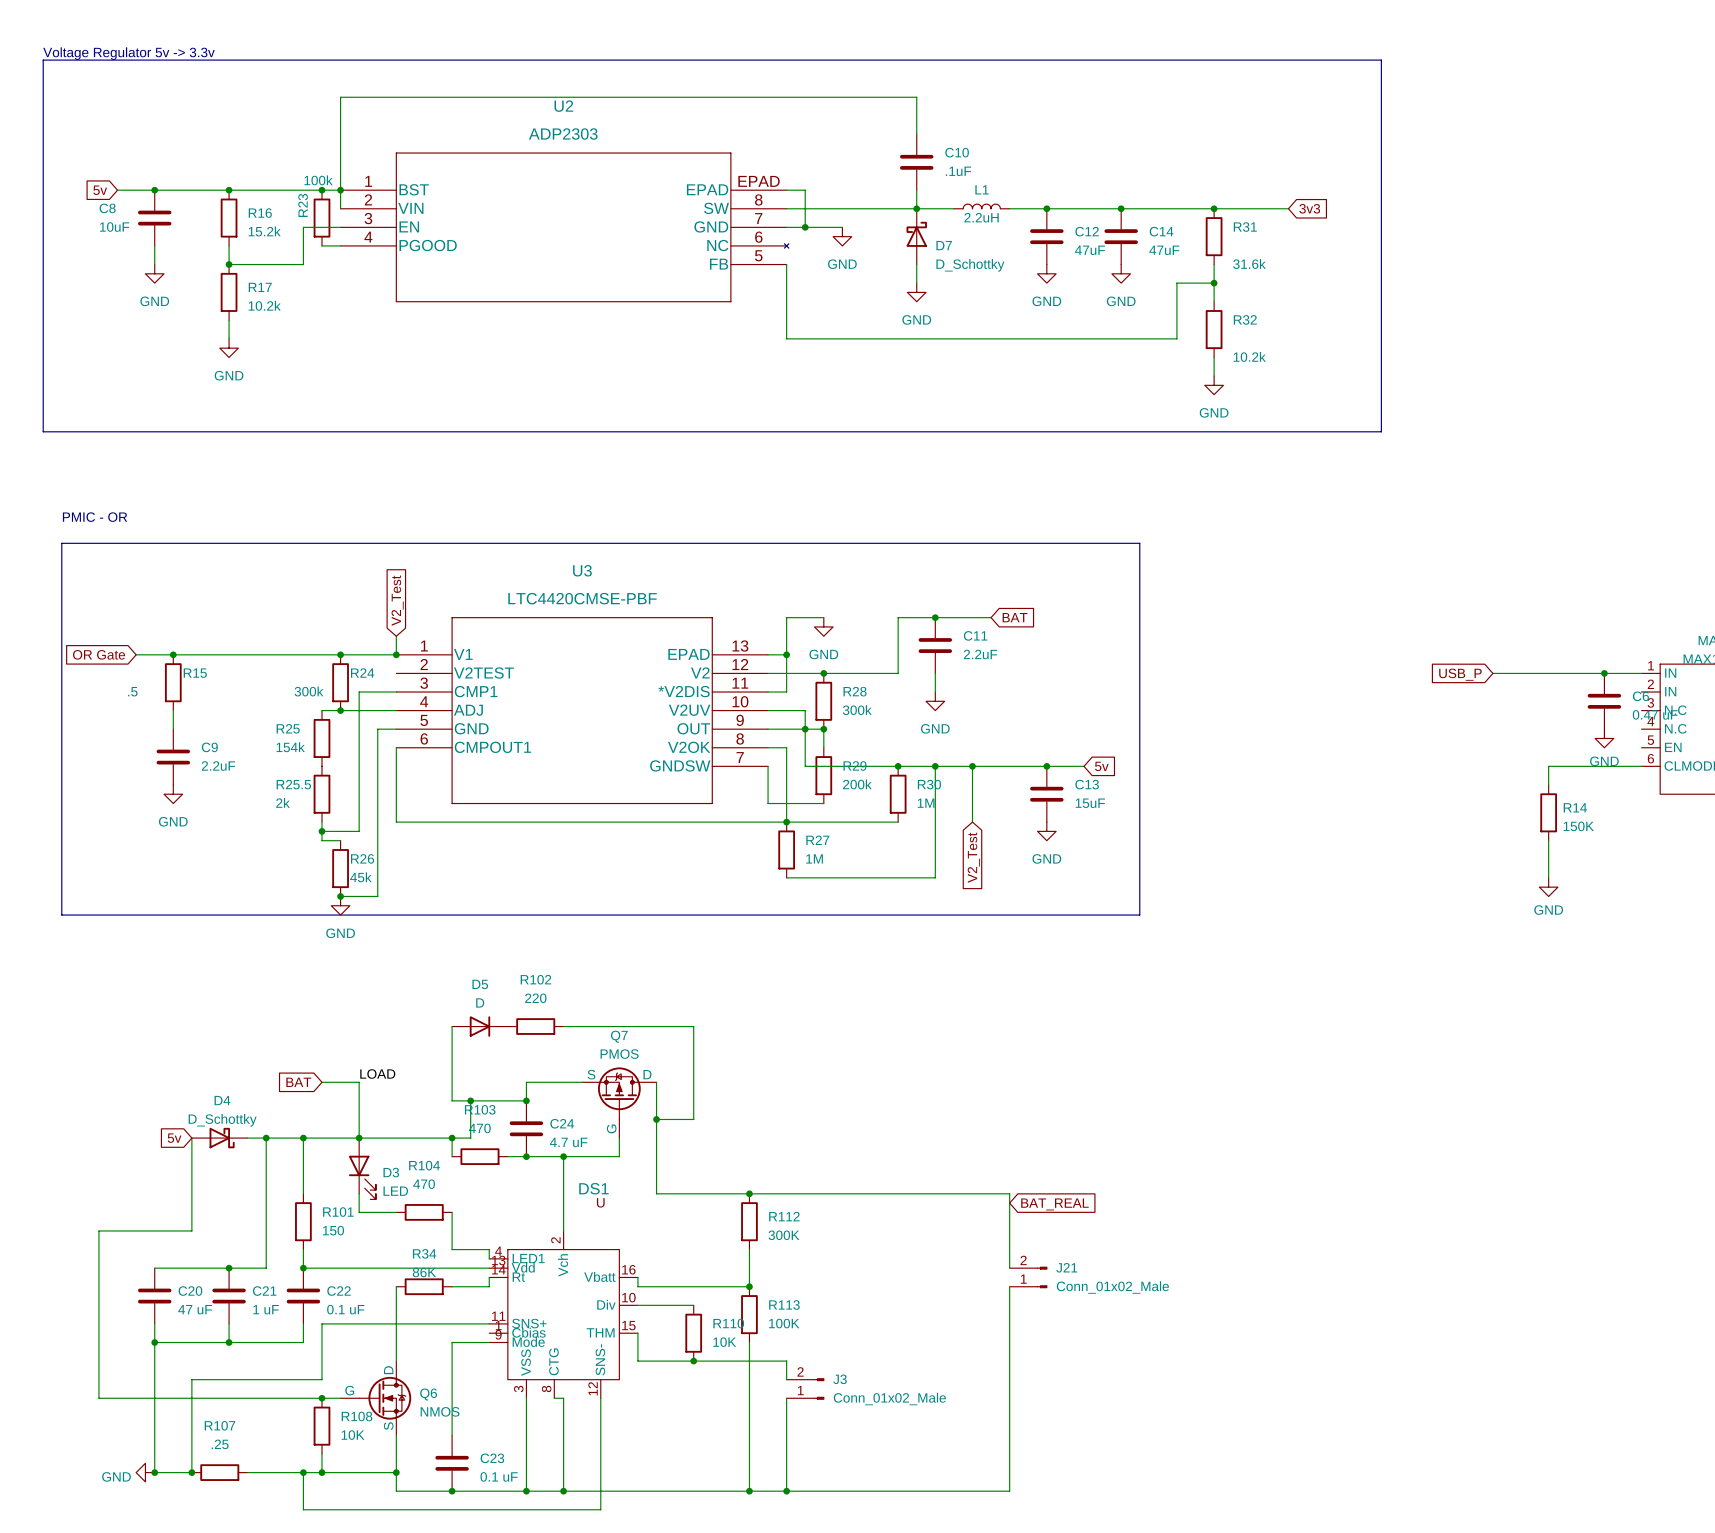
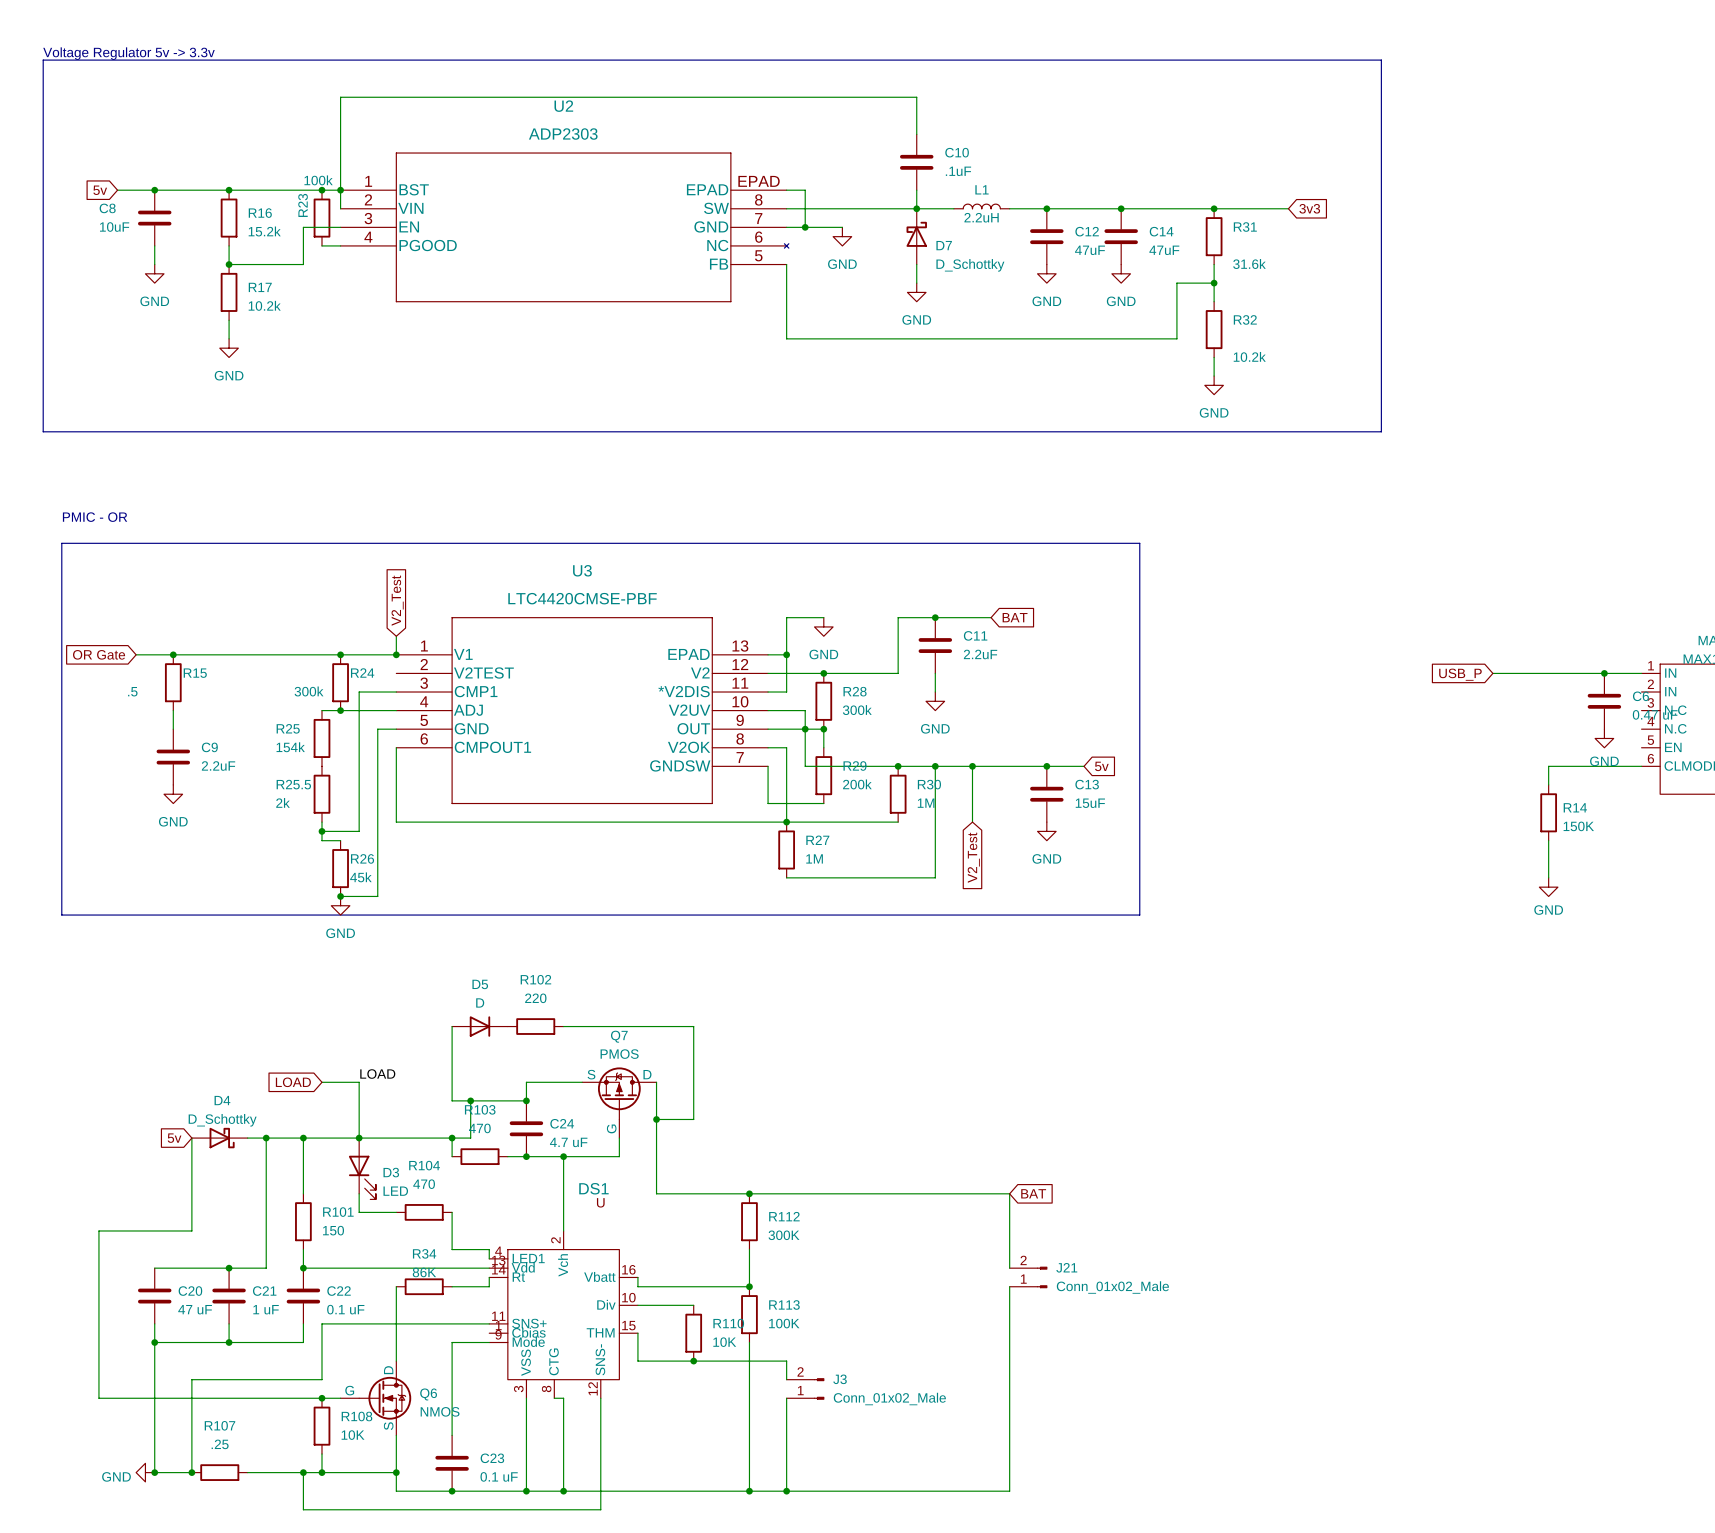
global label: BAT (298, 1082) -> LOAD (293, 1082)
global label: none -> BAT (1033, 1193)
global label: BAT_REAL (1054, 1204) -> none

